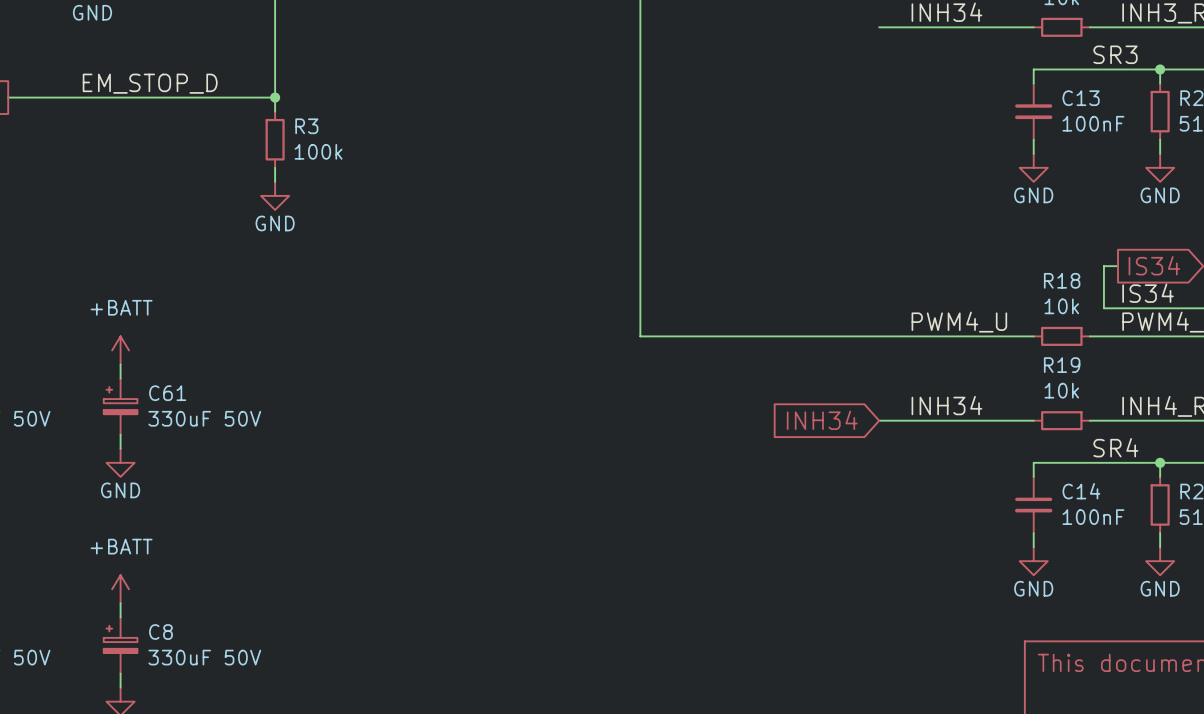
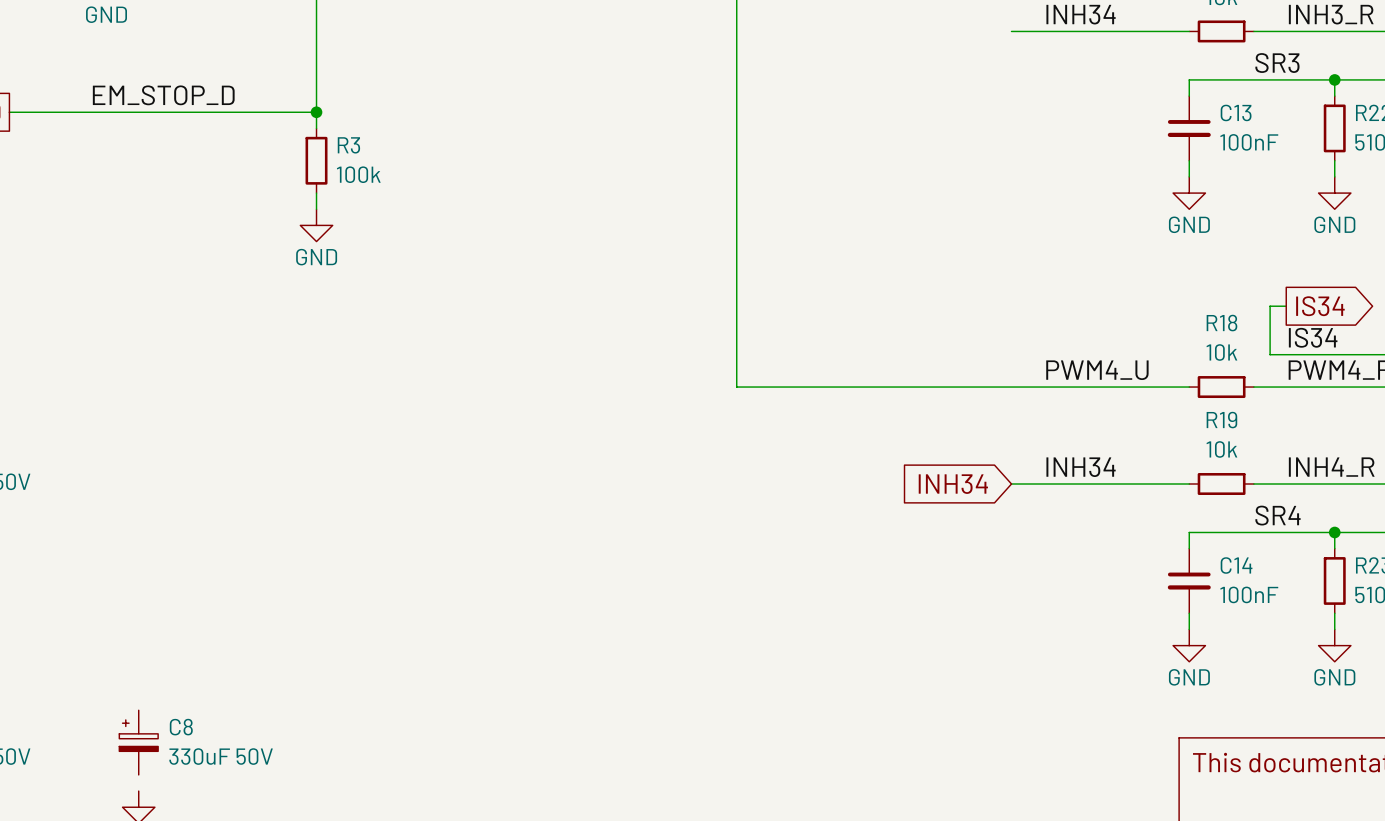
power symbol: +BATT (120, 350) -> none
wire: (120, 364) (120, 378) -> none
C61: 330uF 50V (120, 406) -> none
wire: (120, 434) (120, 448) -> none
power symbol: GND (120, 462) -> none
power symbol: +BATT (120, 589) -> none
wire: (120, 603) (120, 617) -> none
wire: (120, 673) (120, 687) -> none

